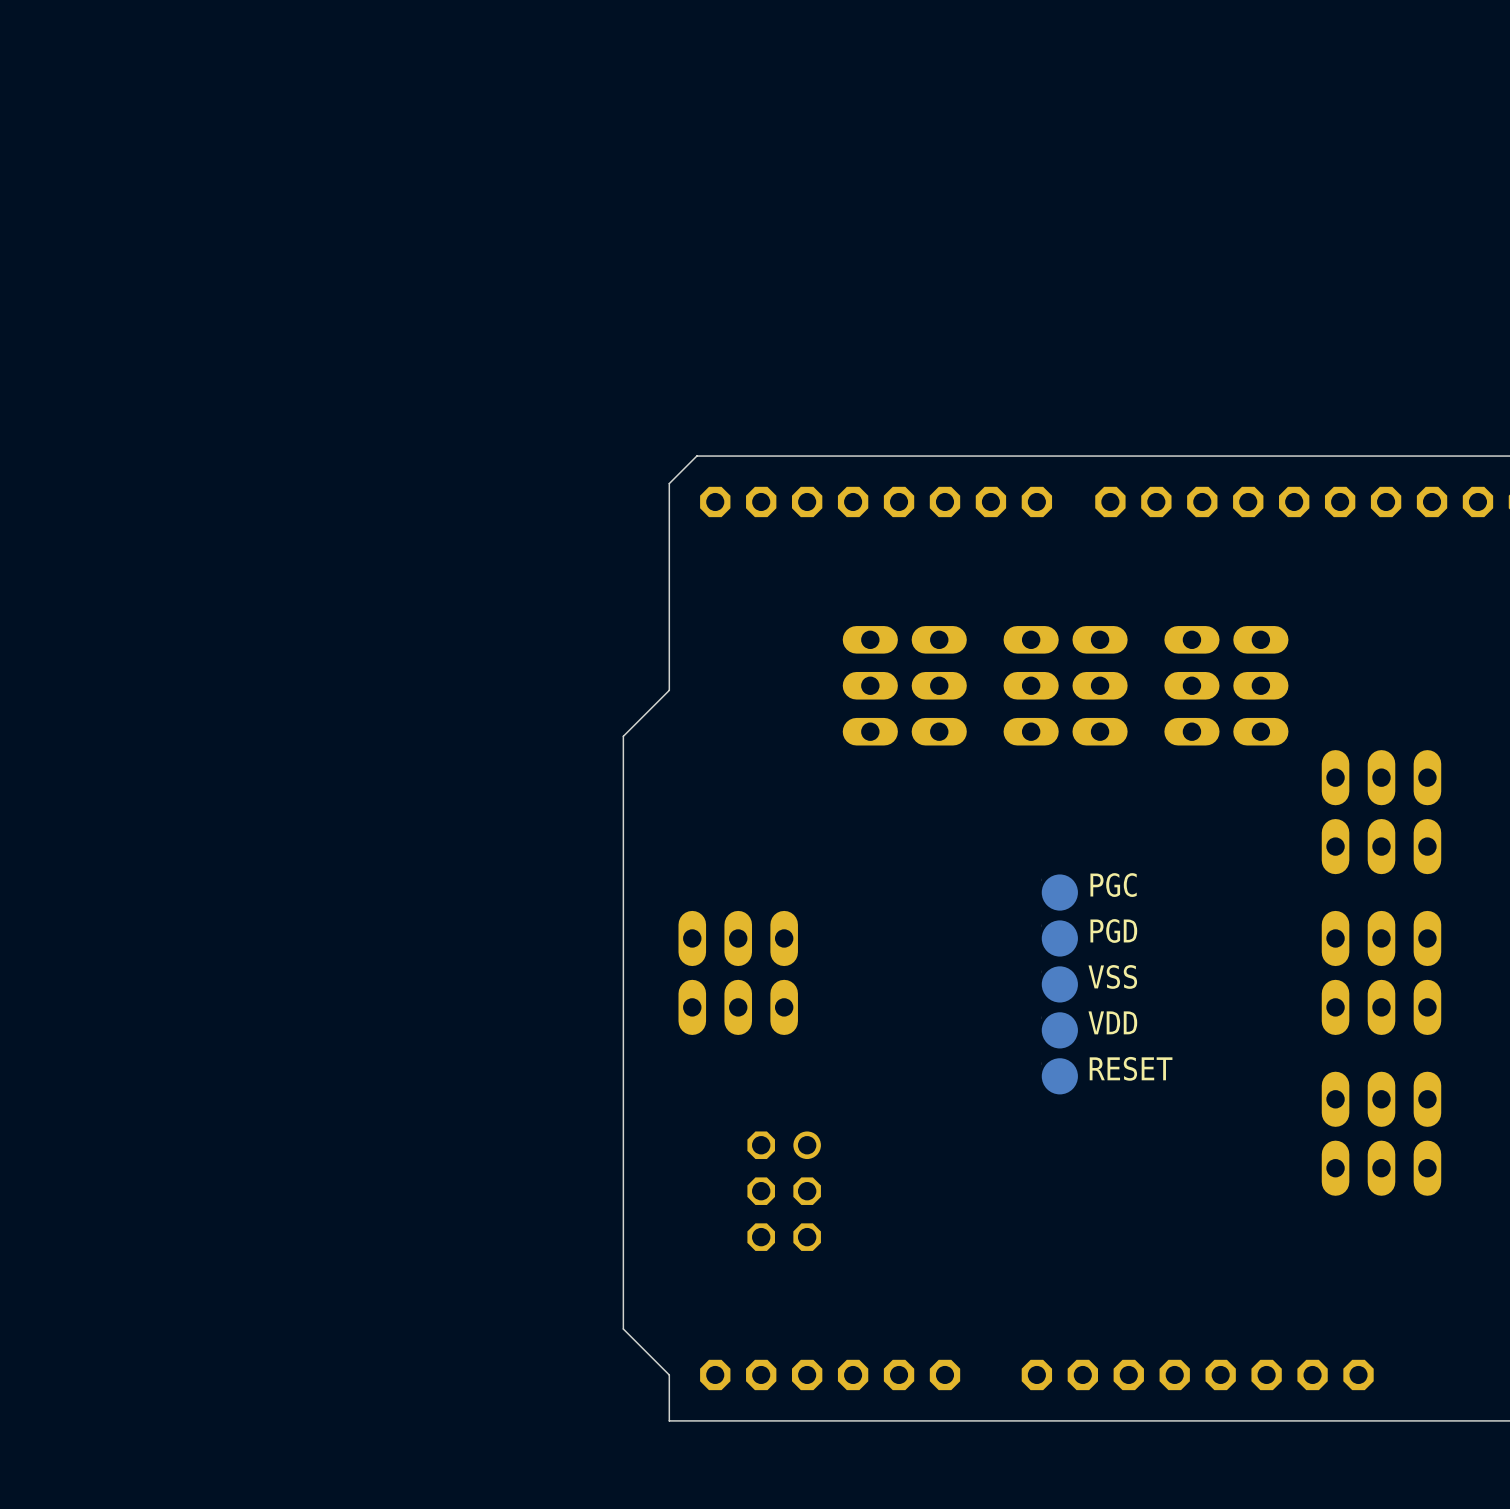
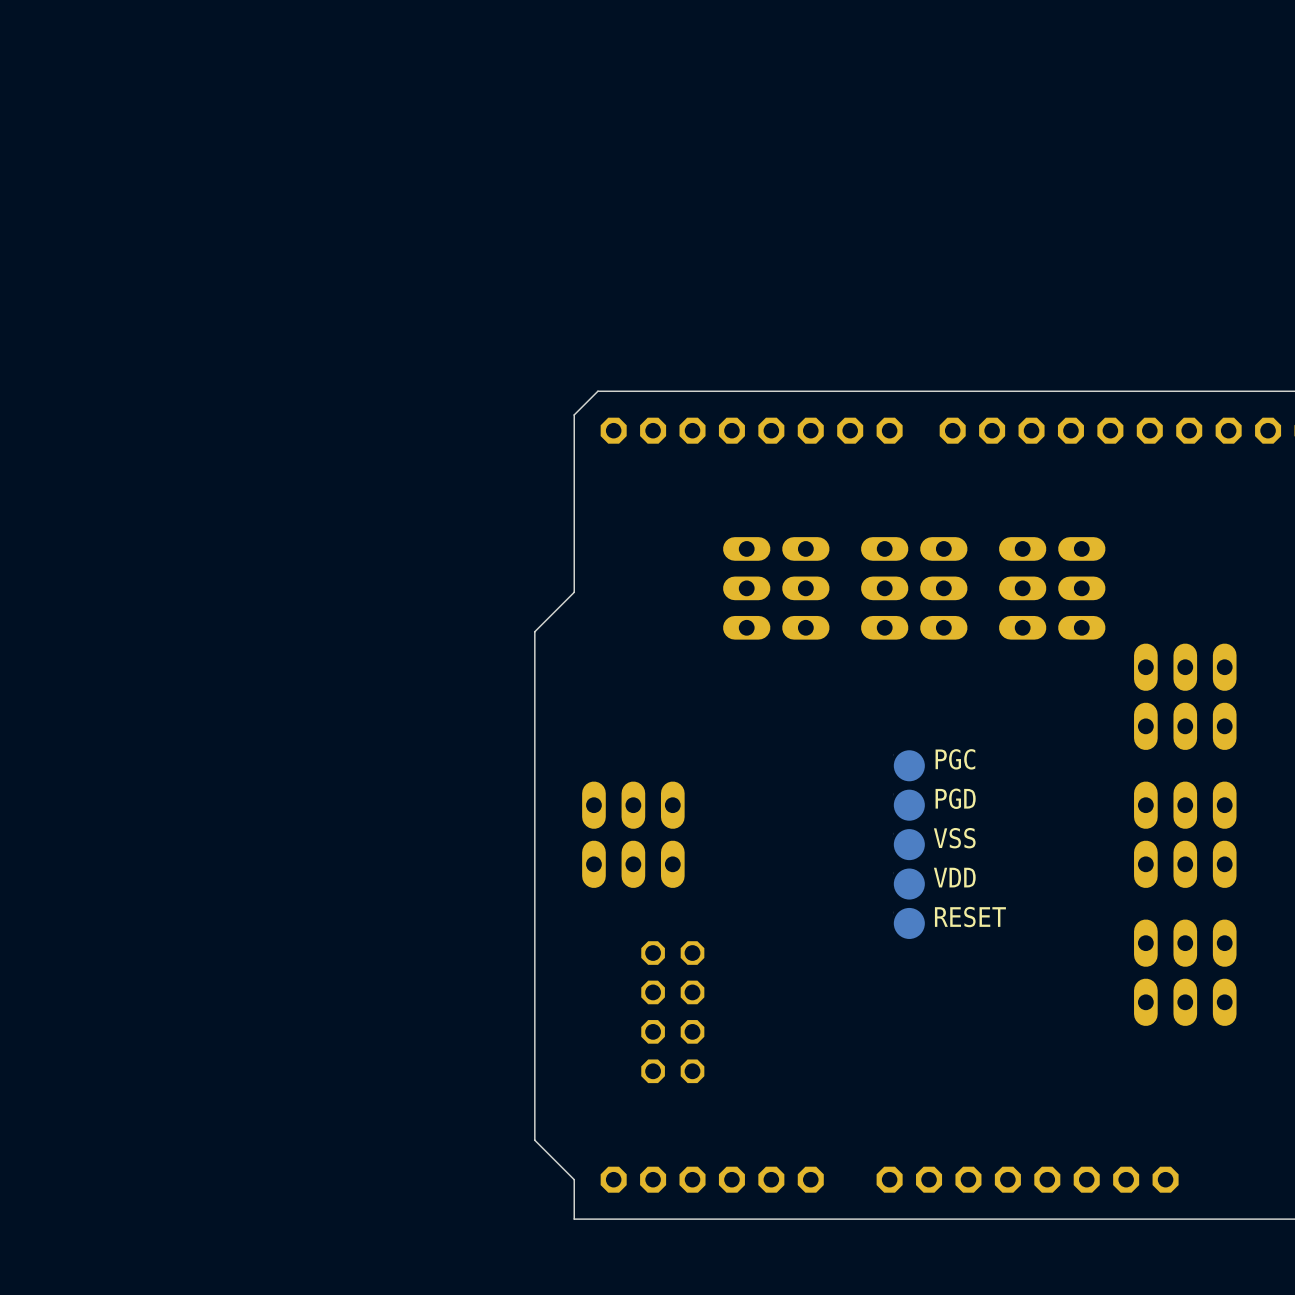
part footprint: [747, 1131, 821, 1251] -> [641, 941, 705, 1084]

